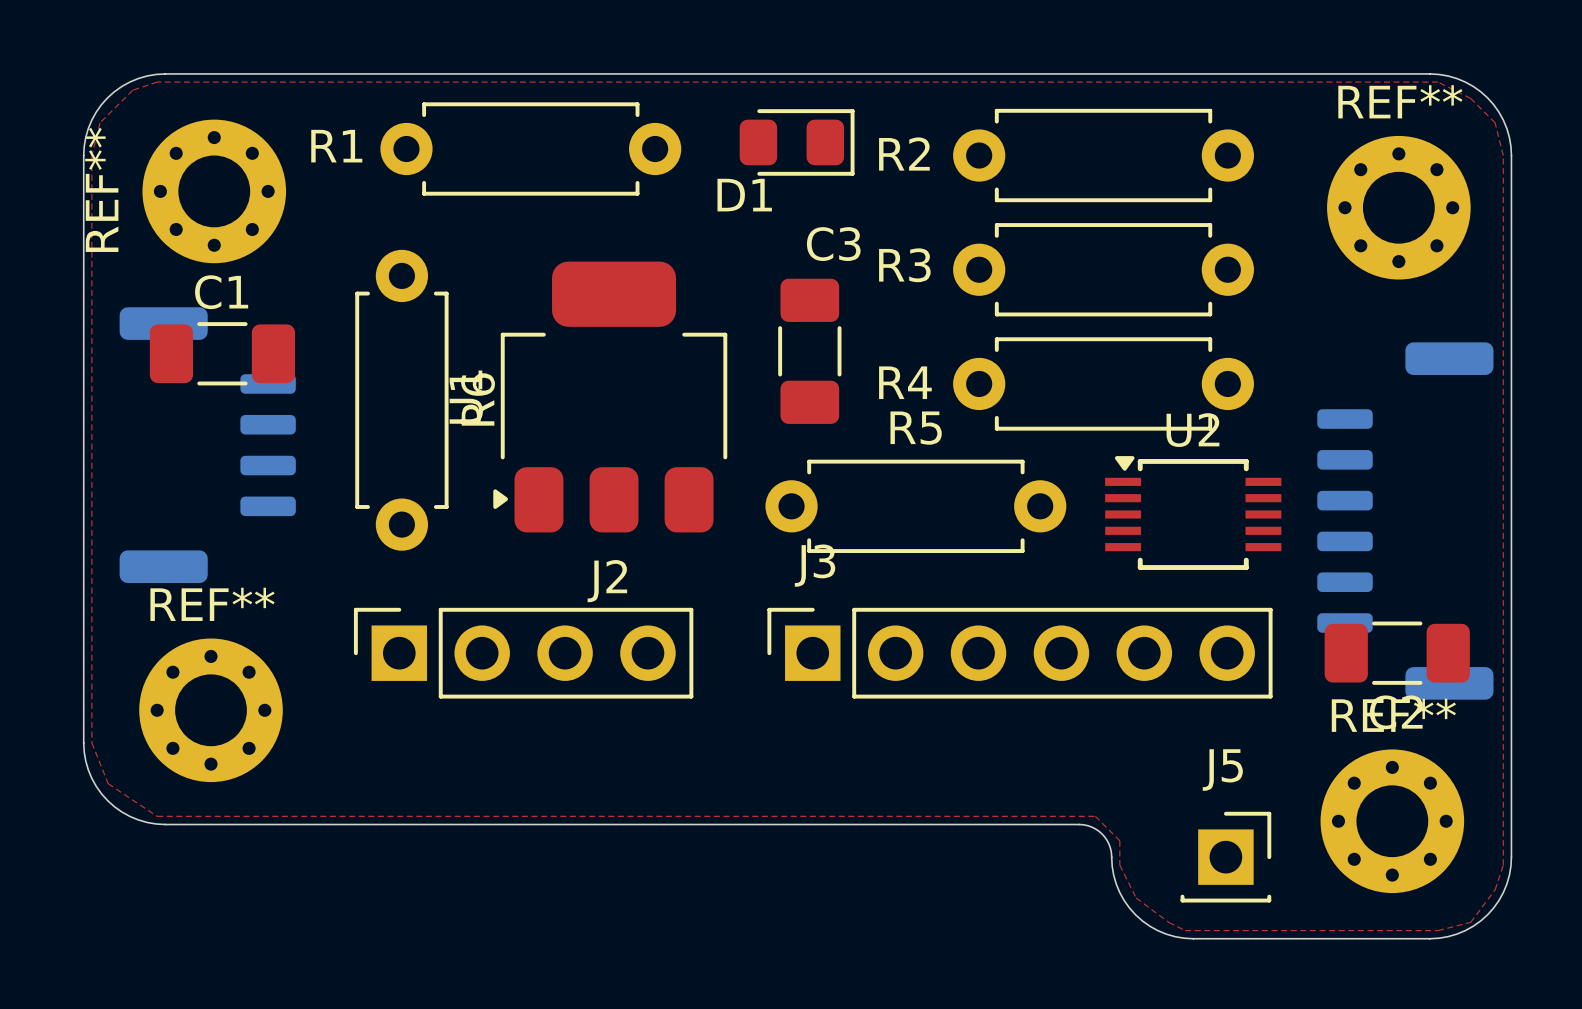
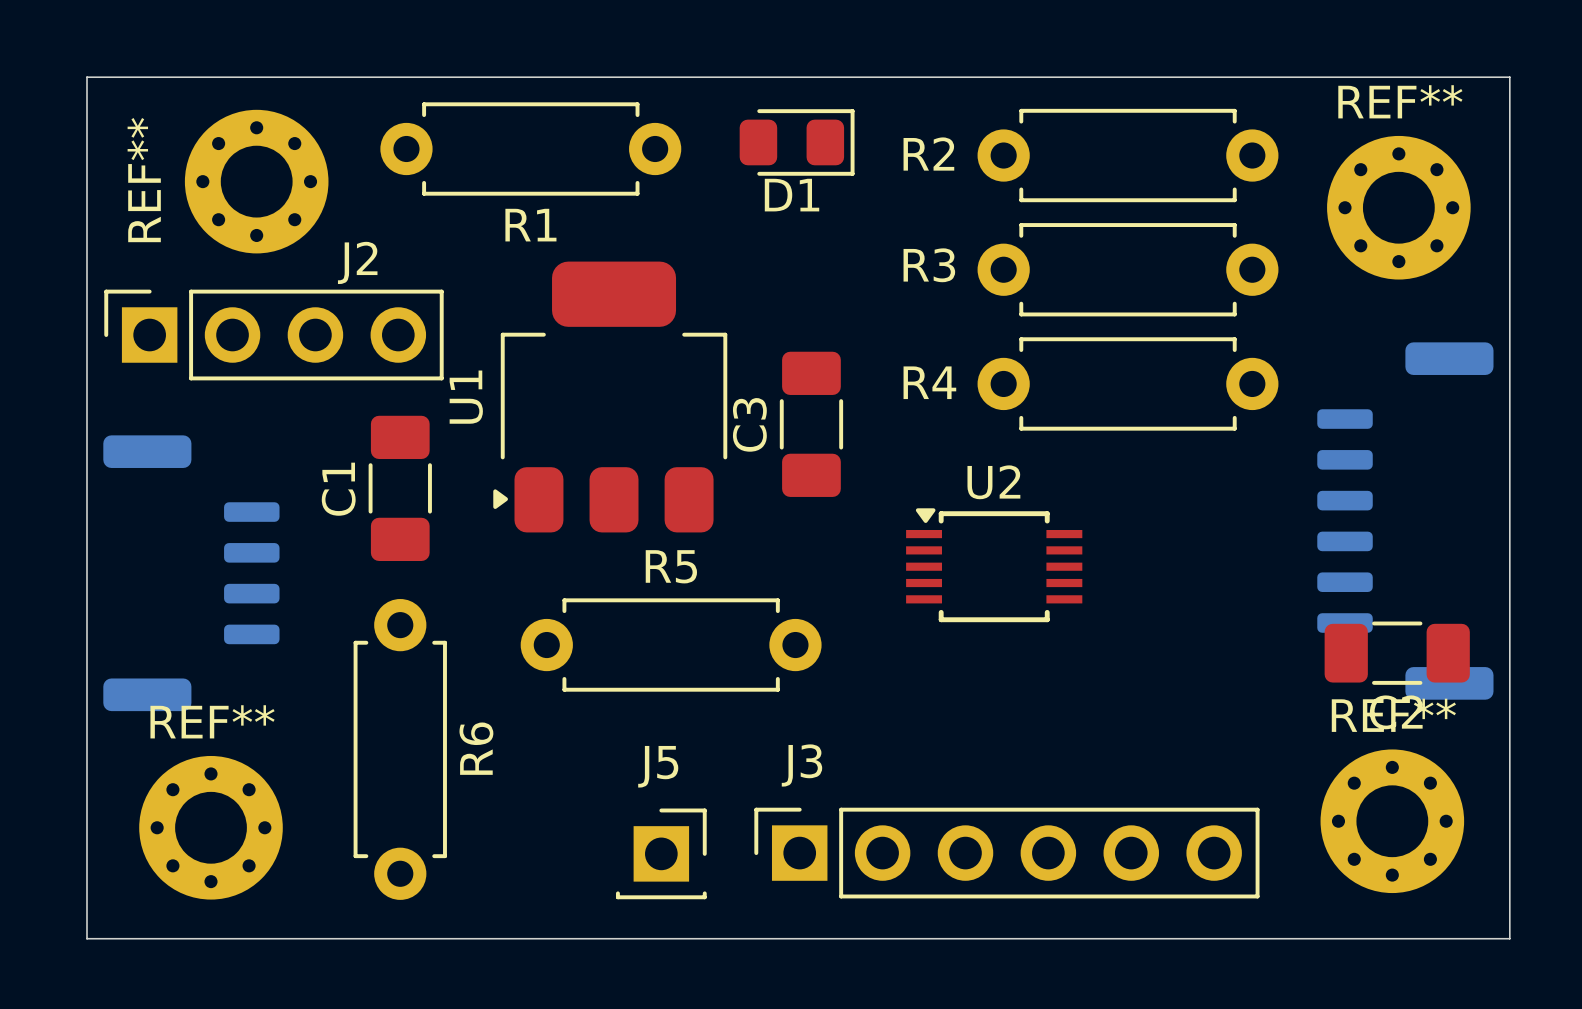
top zone outline: (157, 82) (132, 90) (100, 122) (91, 155) (91, 742) (108, 783) (157, 816) (1095, 816) (1119, 840) (1119, 865) (1136, 897) (1168, 922) (1185, 930) (1438, 930) (1470, 922) (1495, 889) (1503, 865) (1503, 155) (1495, 122) (1470, 98) (1438, 82) (157, 82) -> none
R1 name position: R1 (336, 146) -> R1 (530, 225)
R2 position: (1103, 155) -> (1128, 155)
REF** position: (214, 191) -> (256, 181)
D1 name position: D1 (744, 195) -> D1 (792, 195)
C3 name rotation: 0° (833, 244) -> 90° counterclockwise (749, 424)
C3 name position: C3 (833, 244) -> C3 (749, 424)
R3 position: (1103, 269) -> (1128, 269)
C1 name position: C1 (221, 292) -> C1 (338, 489)
C3 position: (809, 351) -> (811, 424)
C1 rotation: 0° (222, 353) -> 90° clockwise (400, 488)
C1 position: (222, 353) -> (400, 488)
R4 position: (1103, 383) -> (1128, 383)
R6 position: (401, 400) -> (400, 749)
part position: (207, 445) -> (191, 573)
R5 position: (915, 506) -> (671, 645)
U2 position: (1193, 513) -> (994, 565)
J2 position: (523, 653) -> (273, 335)
J3 position: (1019, 653) -> (1006, 853)
REF** position: (211, 710) -> (211, 827)
J5 position: (1225, 857) -> (661, 853)
board edge: (1193, 938) (1166, 934) (1149, 926) (1135, 914) (1124, 900) (1116, 884) (1110, 849) (1106, 839) (1096, 829) (1082, 824) (165, 824) (138, 819) (114, 806) (101, 793) (91, 778) (85, 761) (83, 742) (83, 155) (88, 128) (101, 104) (114, 91) (129, 82) (147, 75) (165, 73) (1429, 73) (1448, 75) (1473, 86) (1487, 97) (1498, 112) (1506, 128) (1511, 155) (1511, 857) (1509, 875) (1503, 892) (1487, 914) (1473, 926) (1456, 934) (1429, 938) -> (1193, 938) (86, 938) (86, 77) (1509, 77) (1509, 938) (1429, 938)

